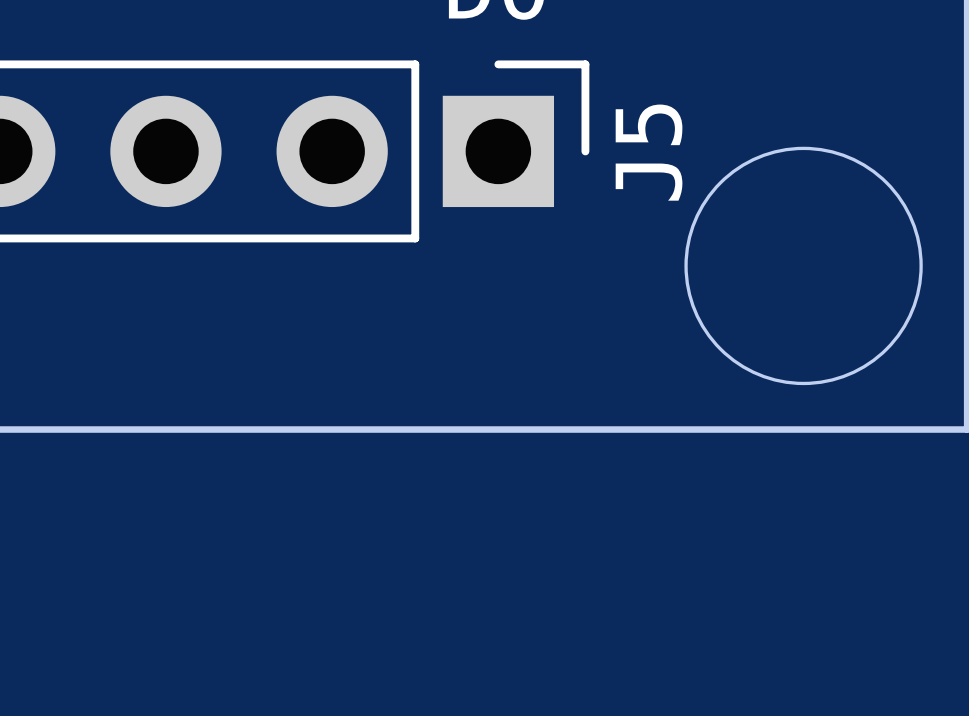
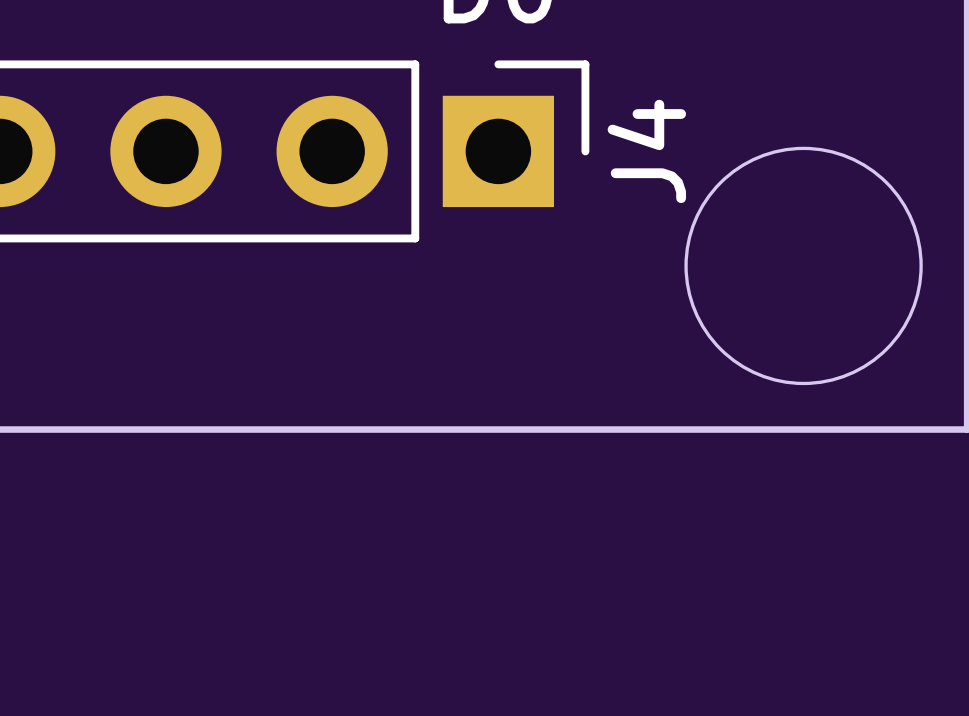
J5 name: J5 (649, 152) -> J4 (646, 151)

